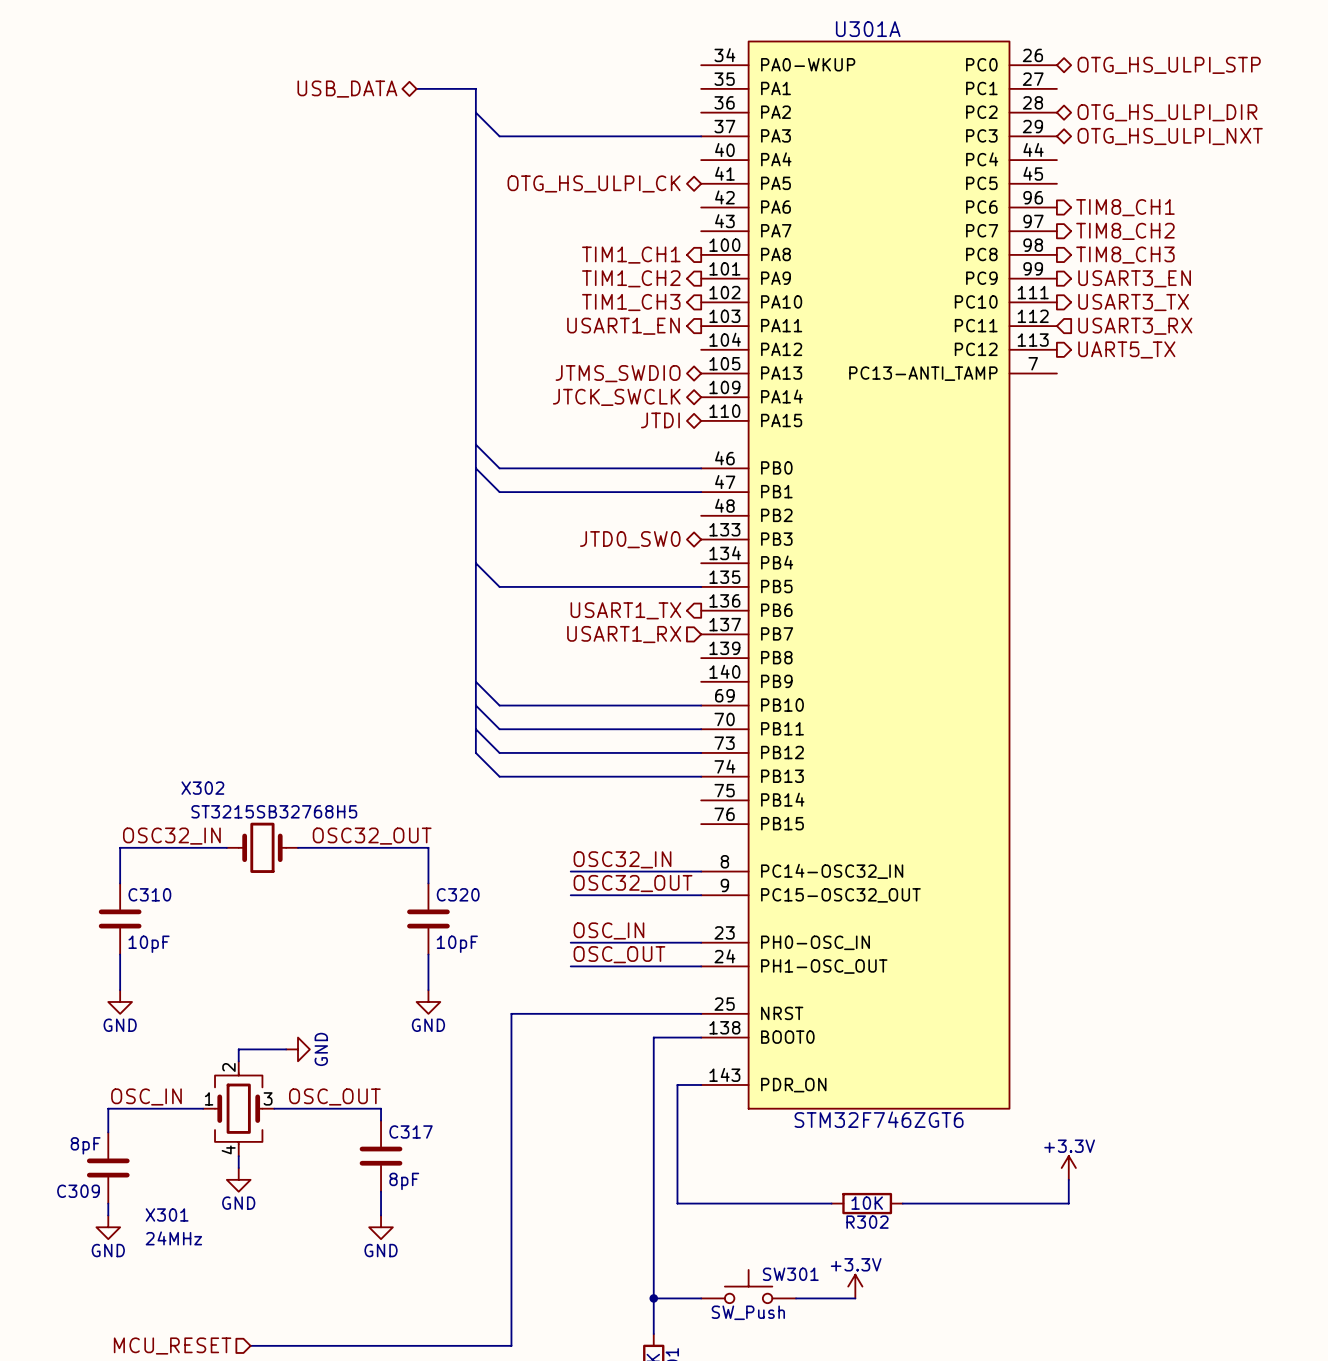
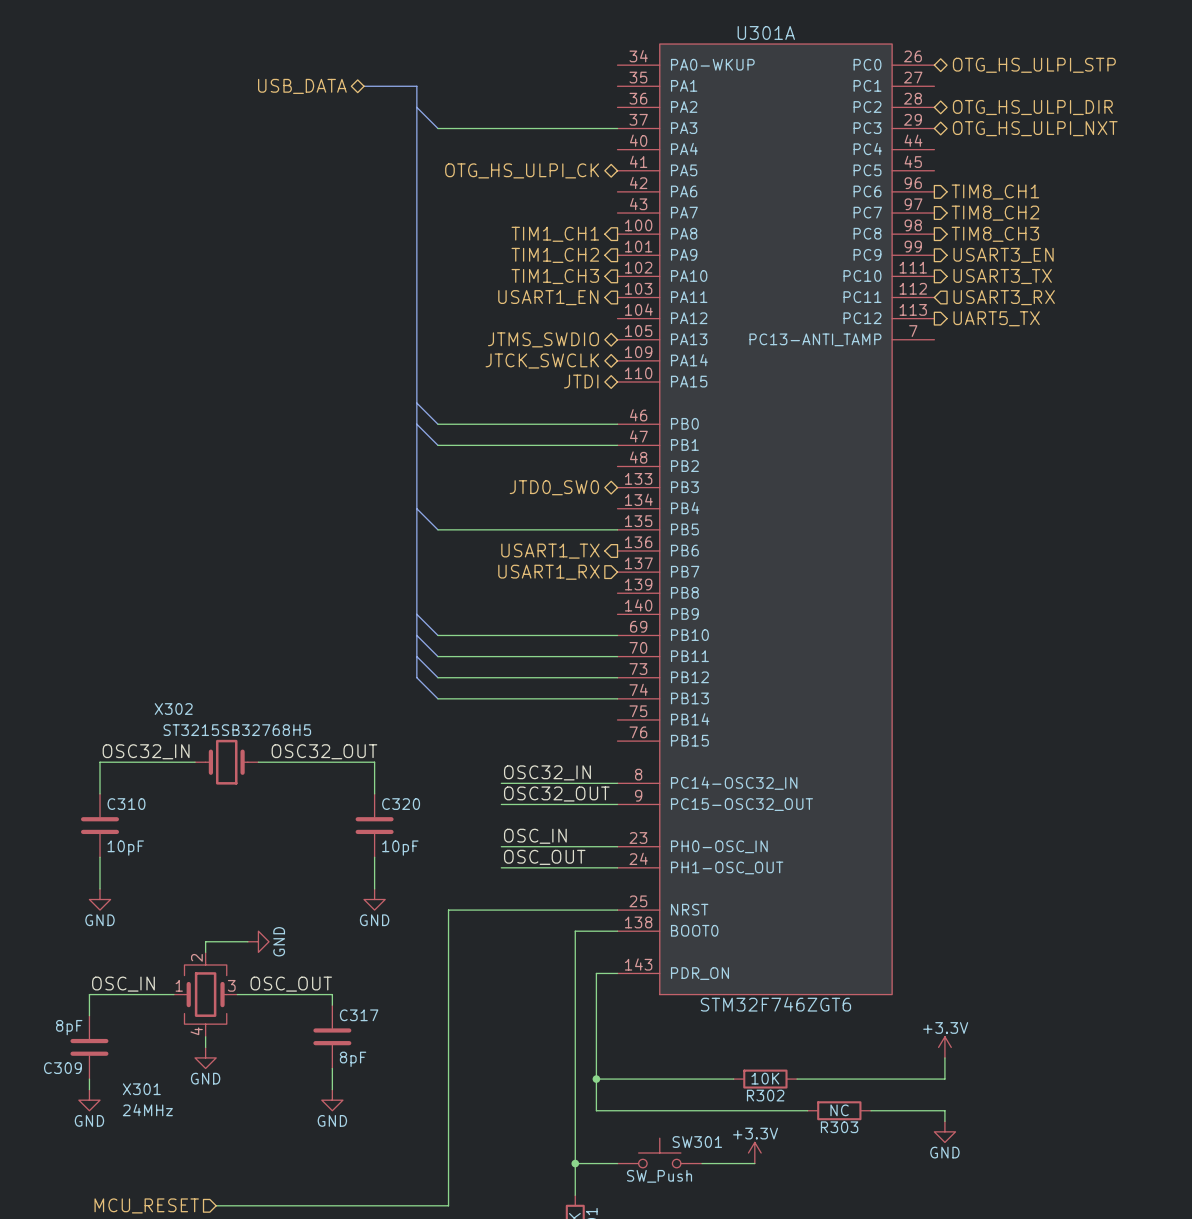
wire: none -> (596, 1079) (596, 1110) (807, 1110)
junction: none -> (596, 1079)
R303: none -> NC (839, 1110)
wire: none -> (871, 1110) (944, 1110) (944, 1121)
power symbol: none -> GND (944, 1131)

